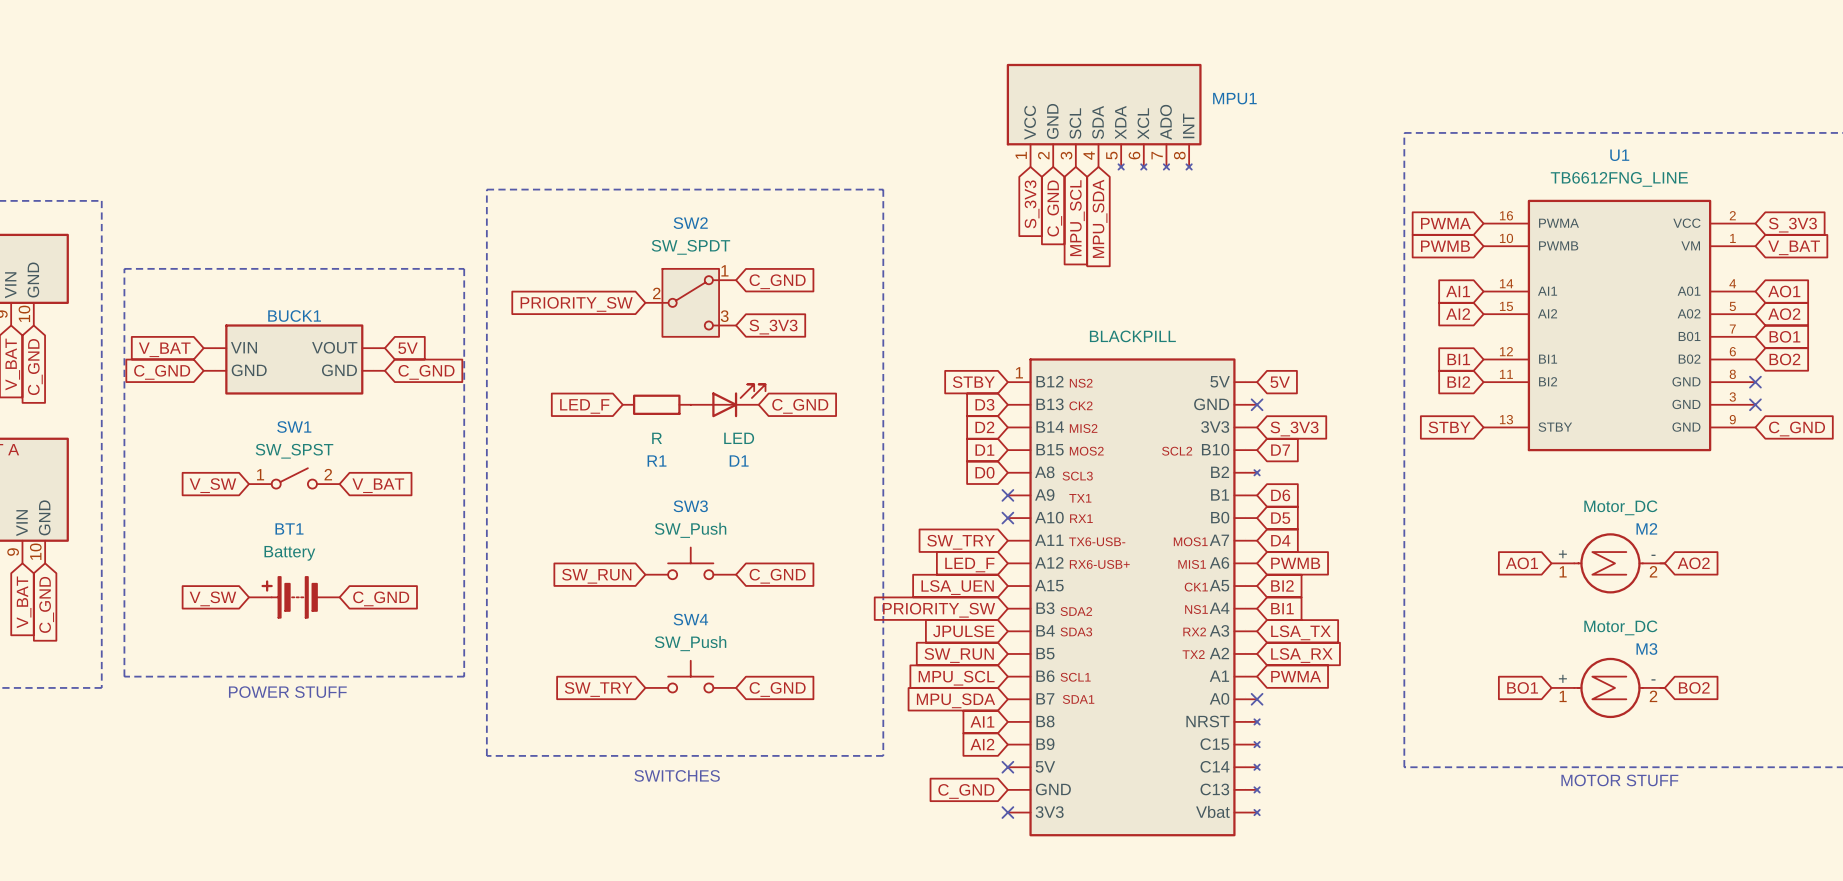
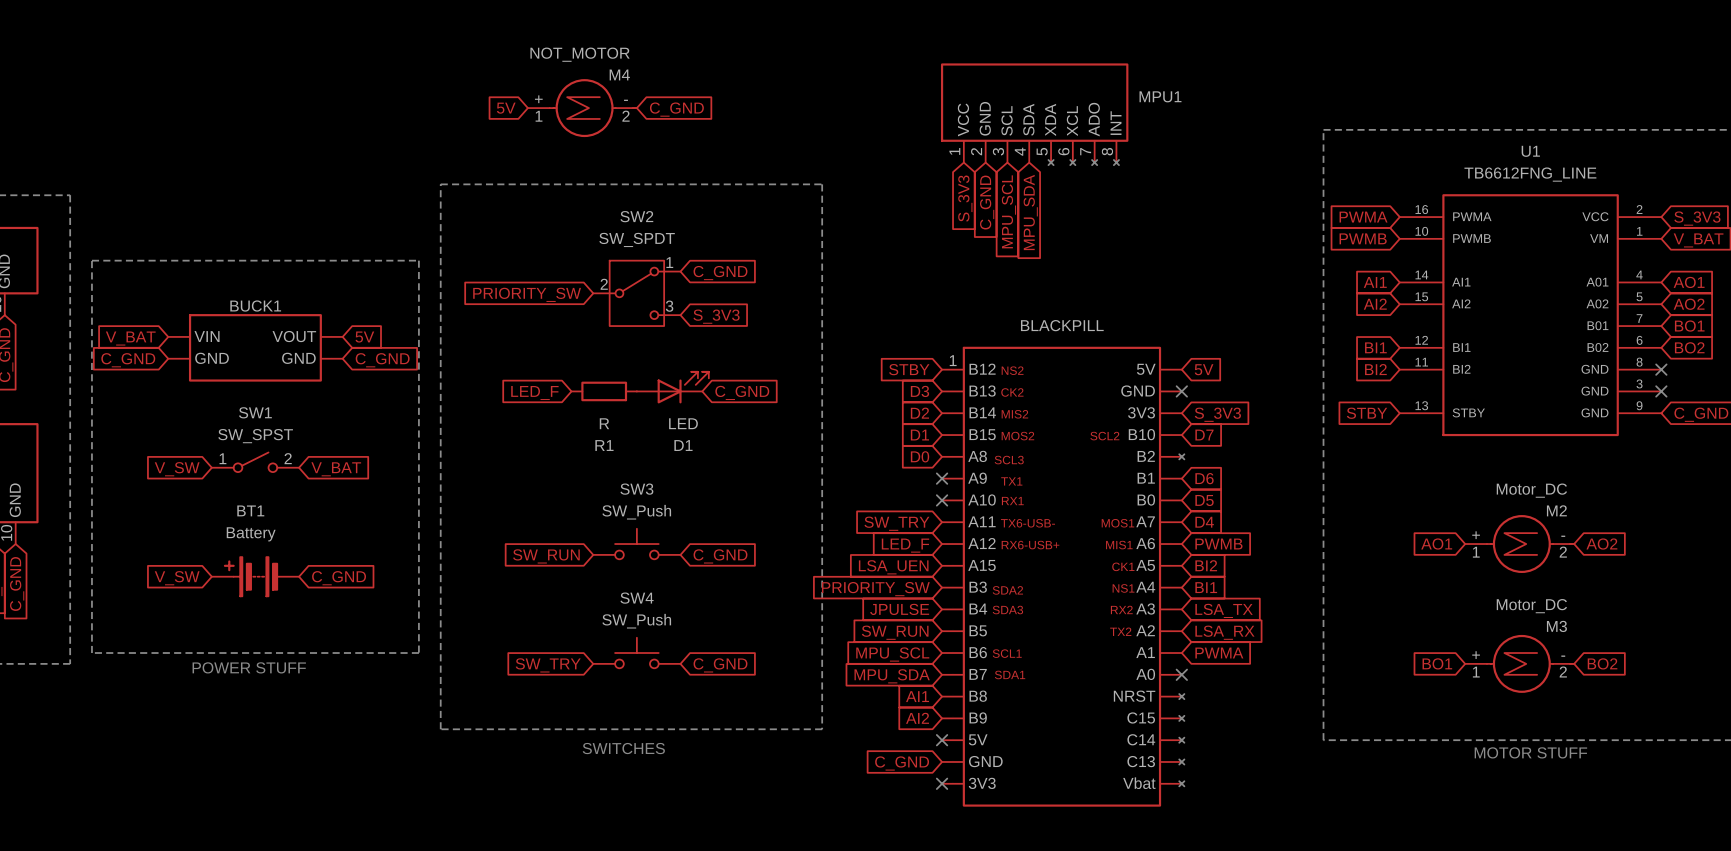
global label: none -> 5V (506, 108)
M4: none -> NOT_MOTOR (582, 108)
global label: none -> C_GND (676, 109)

